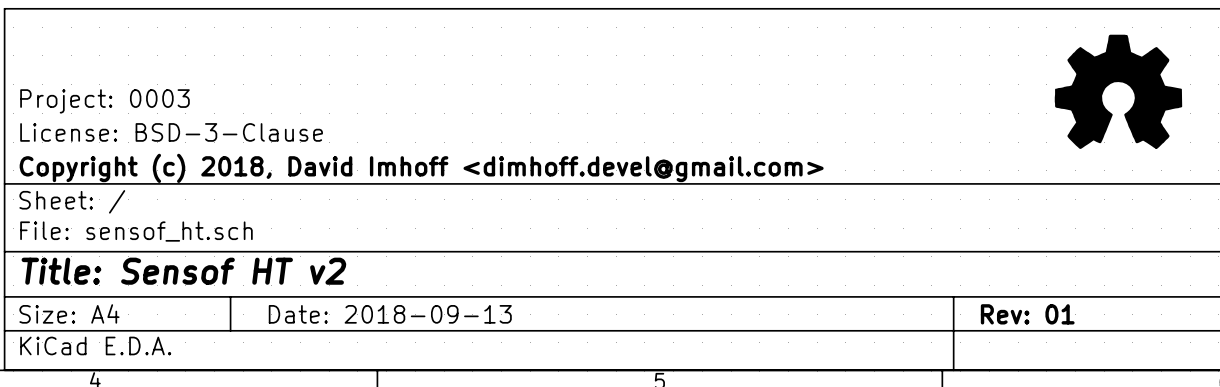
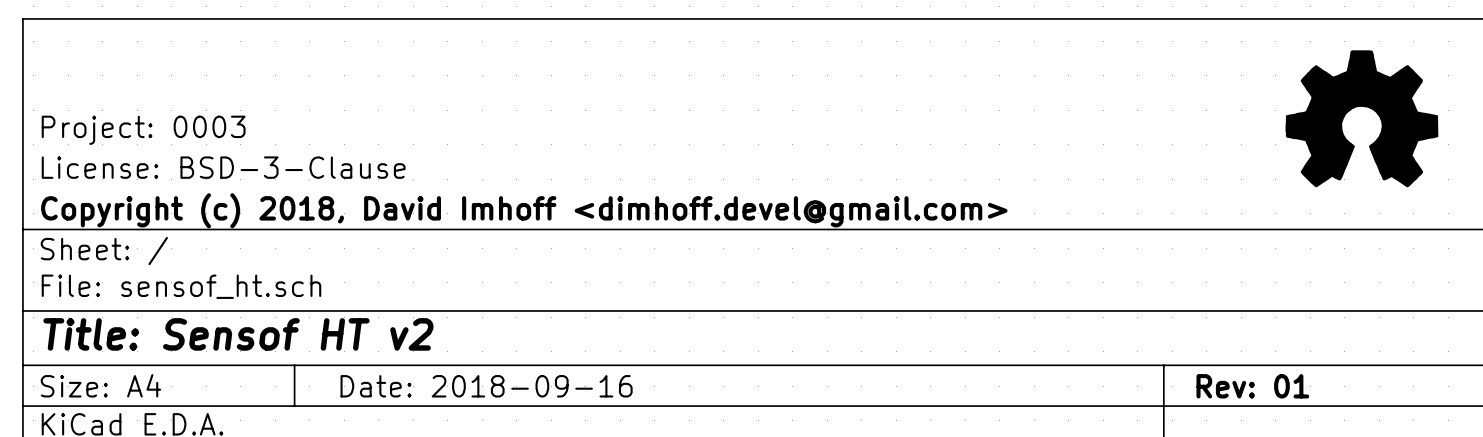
title block: Date: 2018-09-13 (390, 314) -> Date: 2018-09-16 (486, 386)

